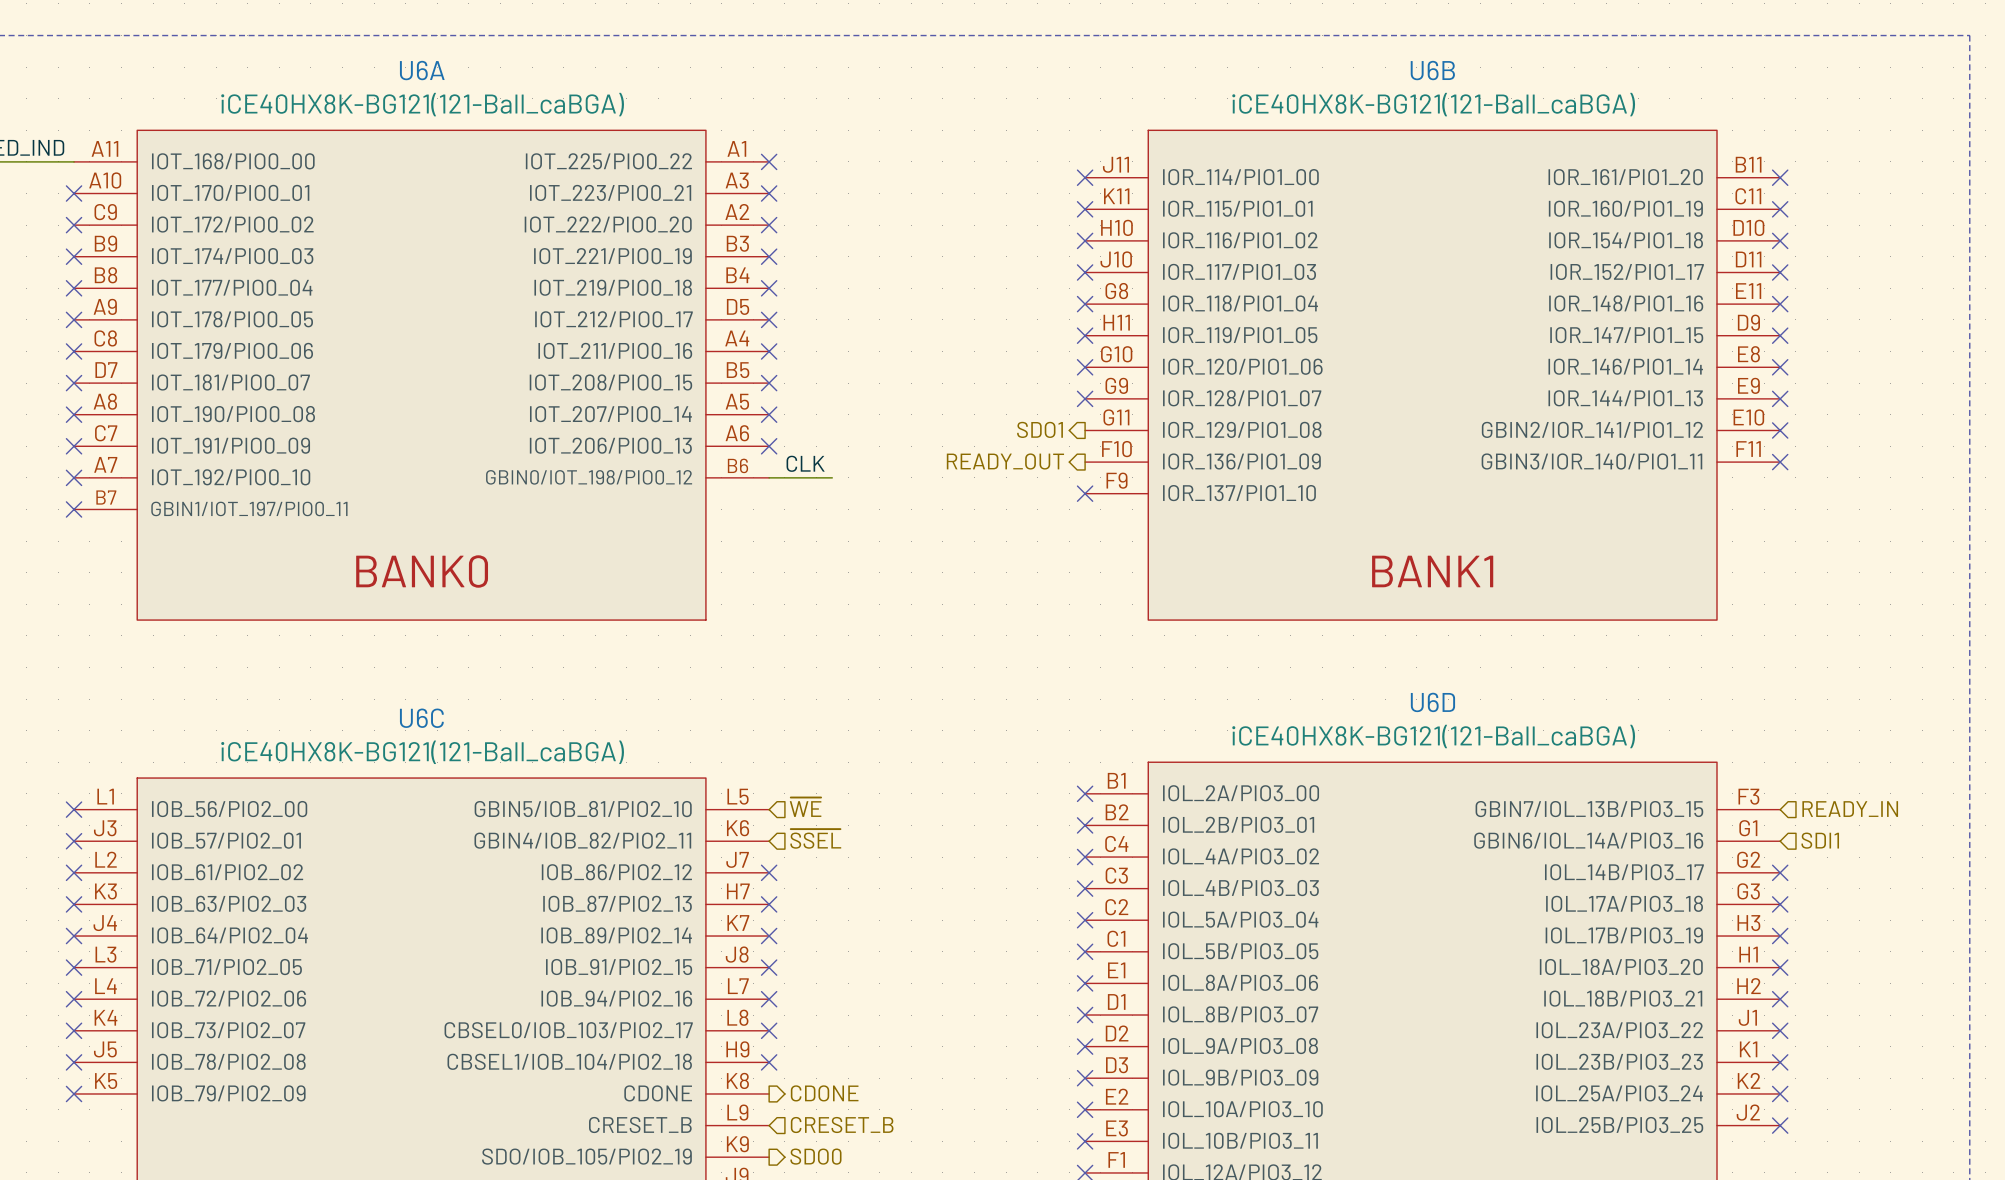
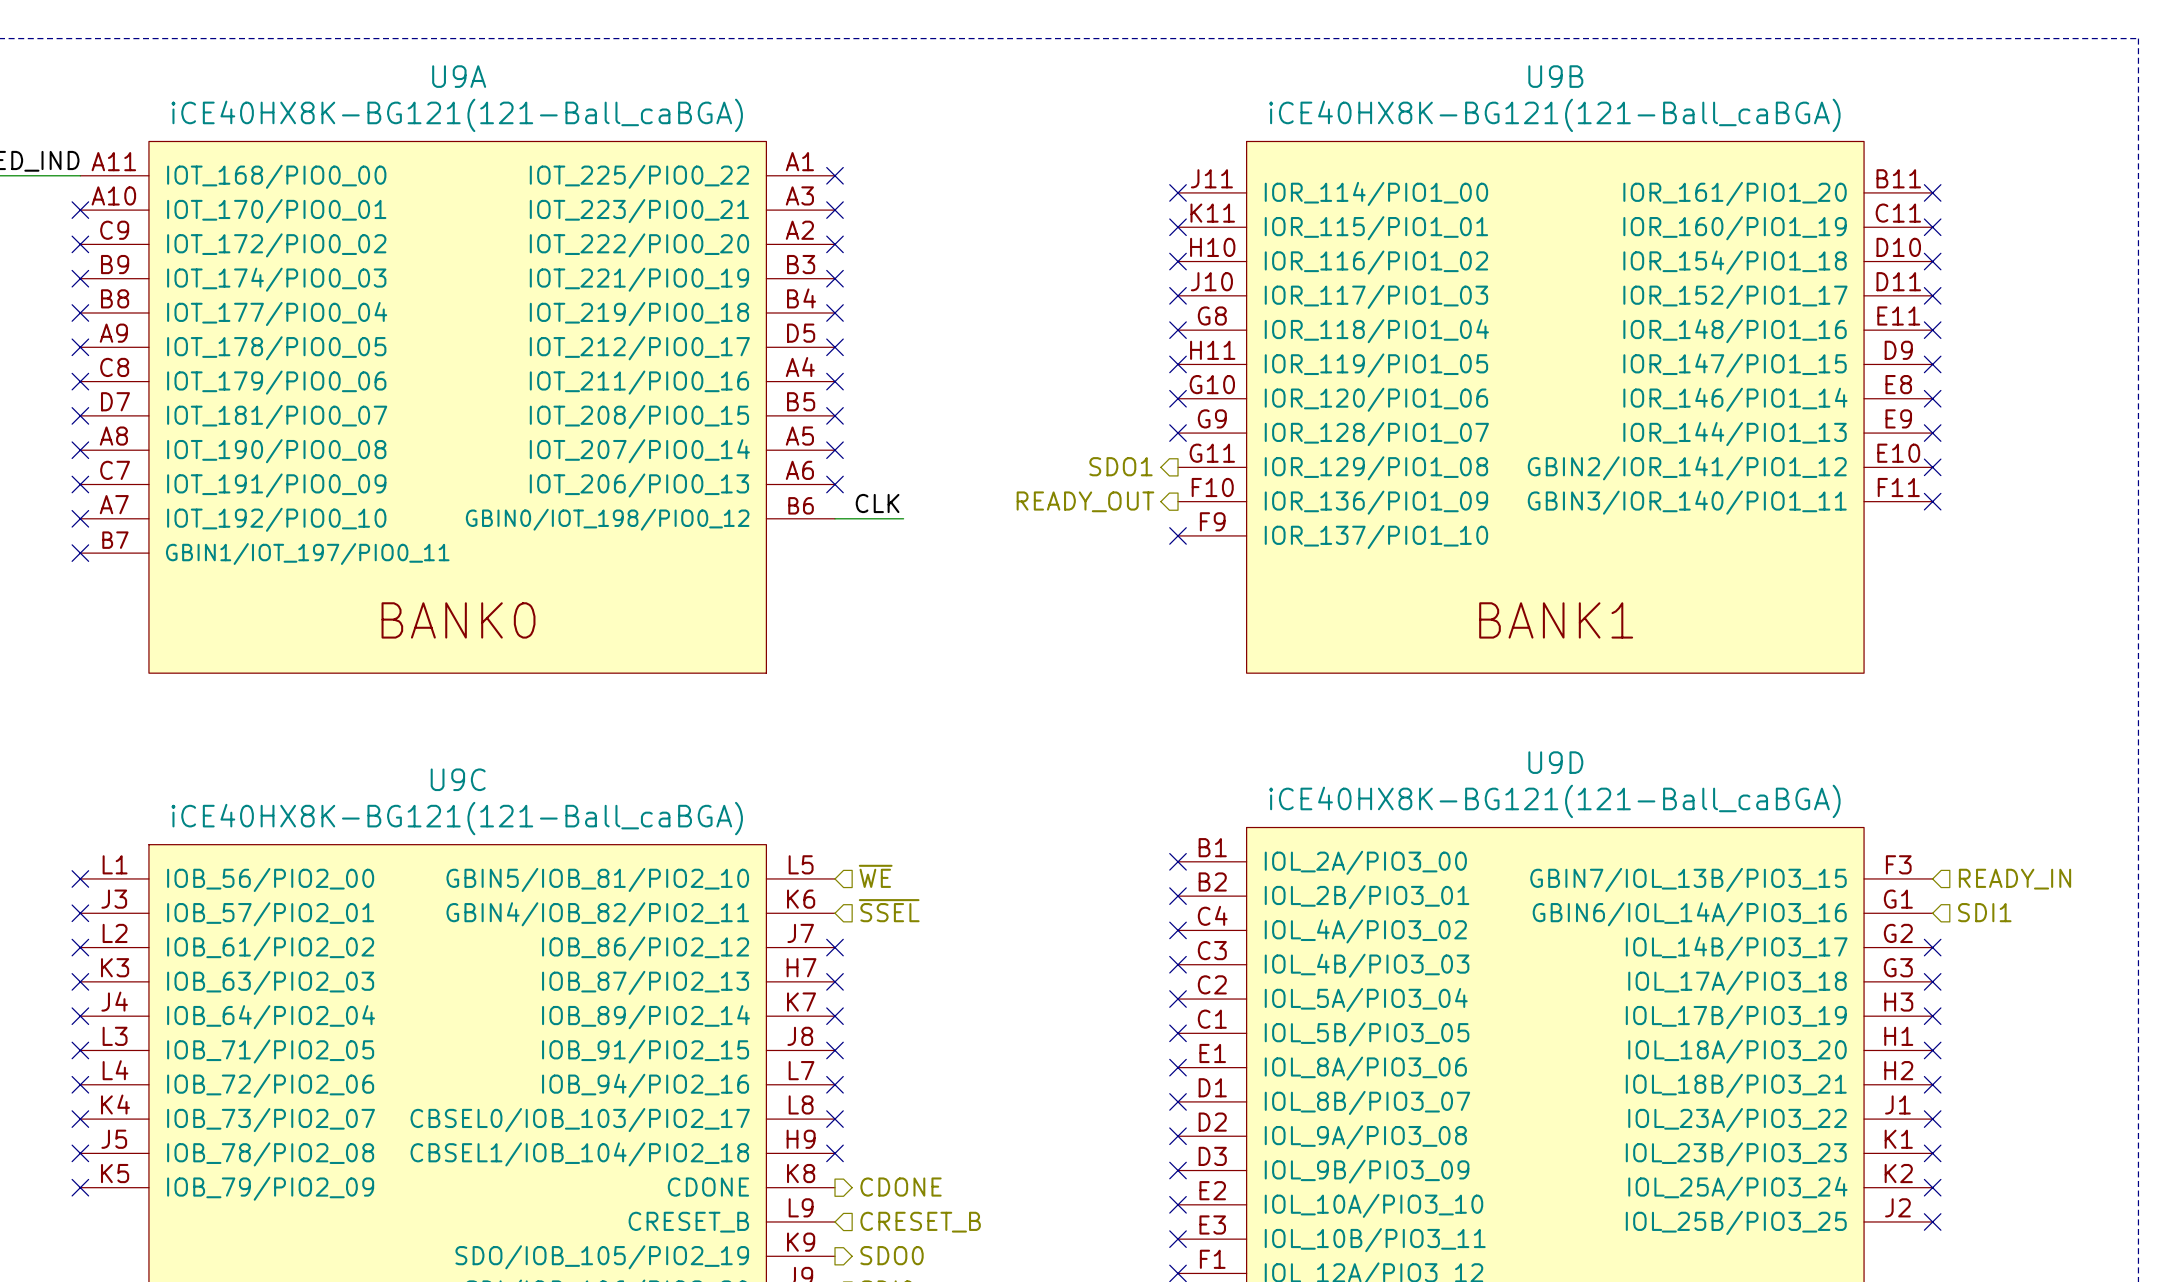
U6A name: U6A (422, 70) -> U9A (459, 76)
U6B name: U6B (1432, 70) -> U9B (1555, 76)
U6D name: U6D (1432, 702) -> U9D (1555, 762)
U6C name: U6C (421, 718) -> U9C (458, 779)

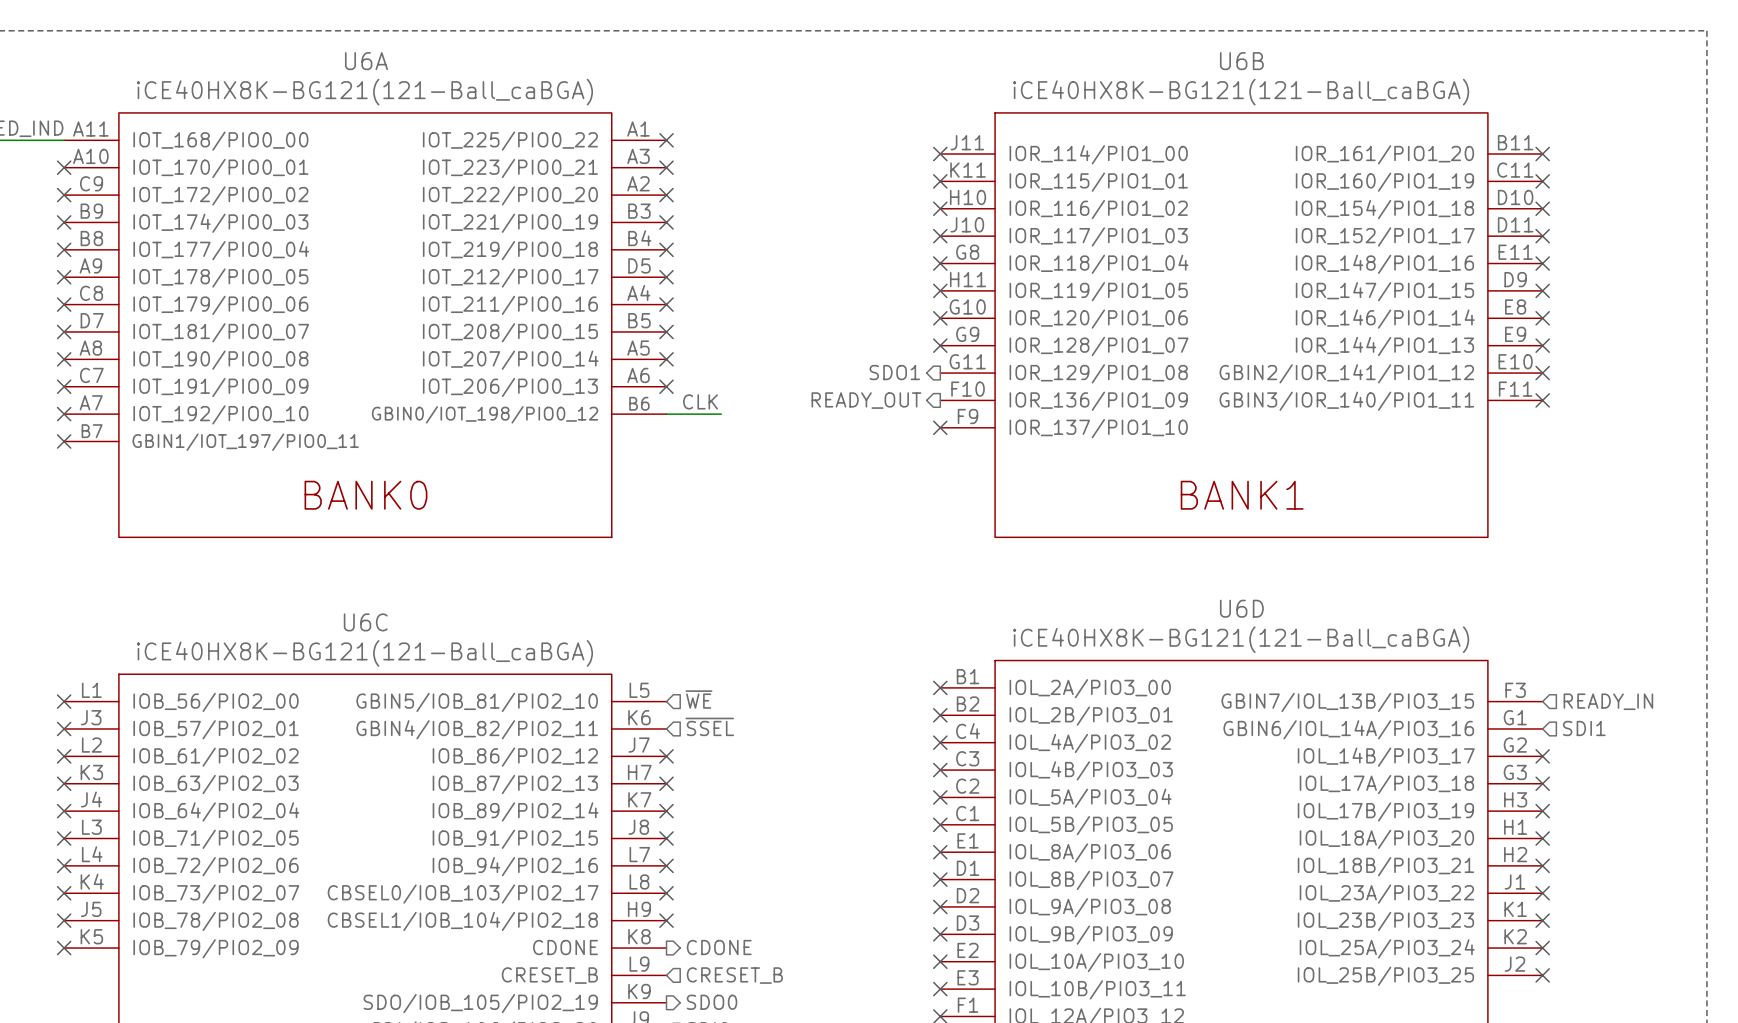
U9A name: U9A (459, 76) -> U6A (366, 61)
U9B name: U9B (1555, 76) -> U6B (1241, 61)
U9D name: U9D (1555, 762) -> U6D (1241, 608)
U9C name: U9C (458, 779) -> U6C (365, 622)

